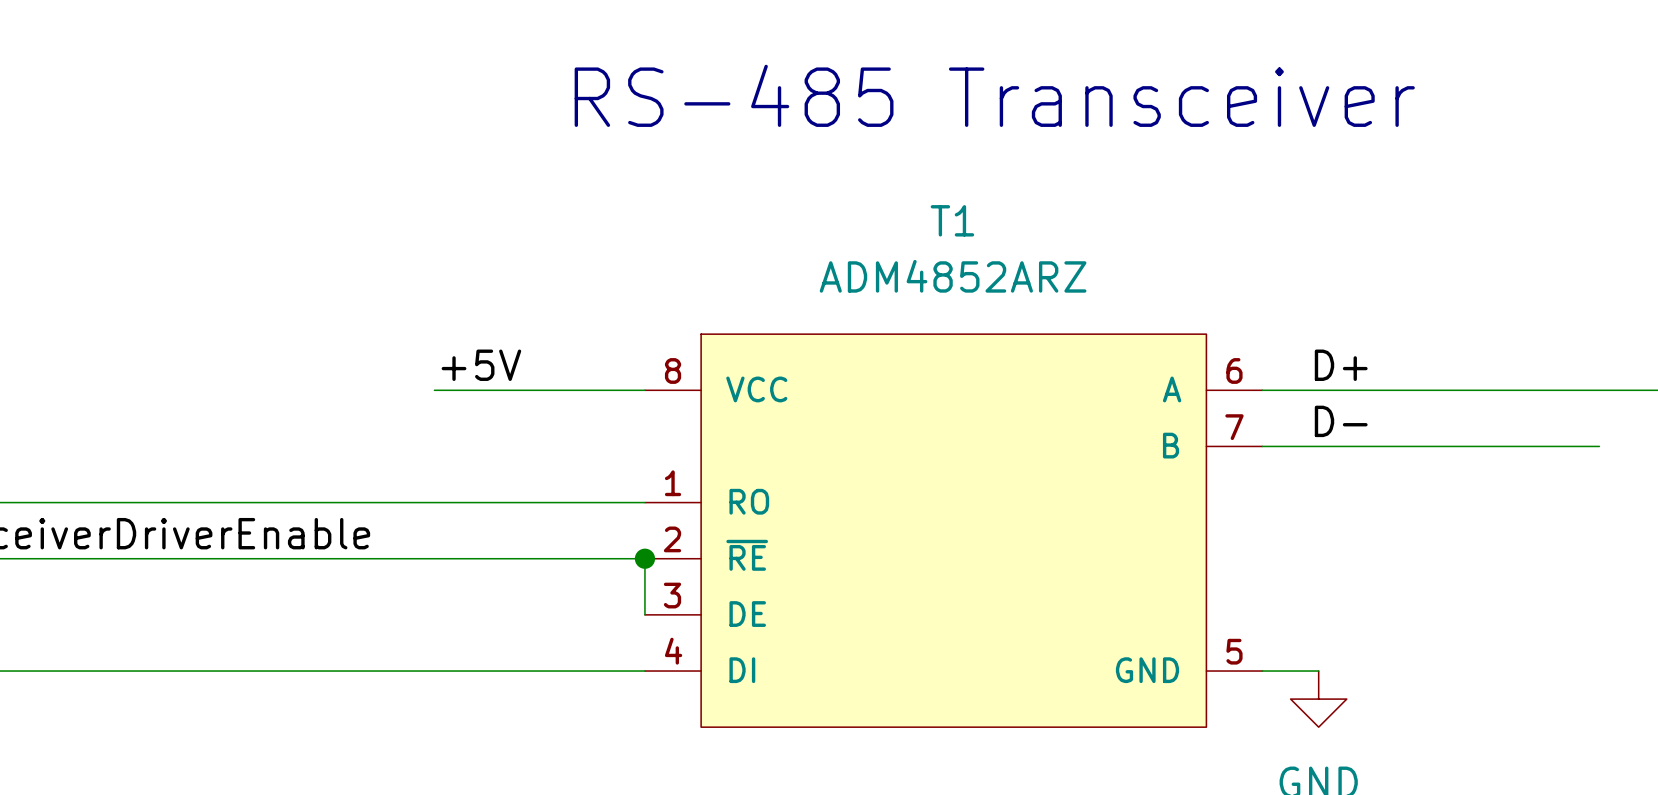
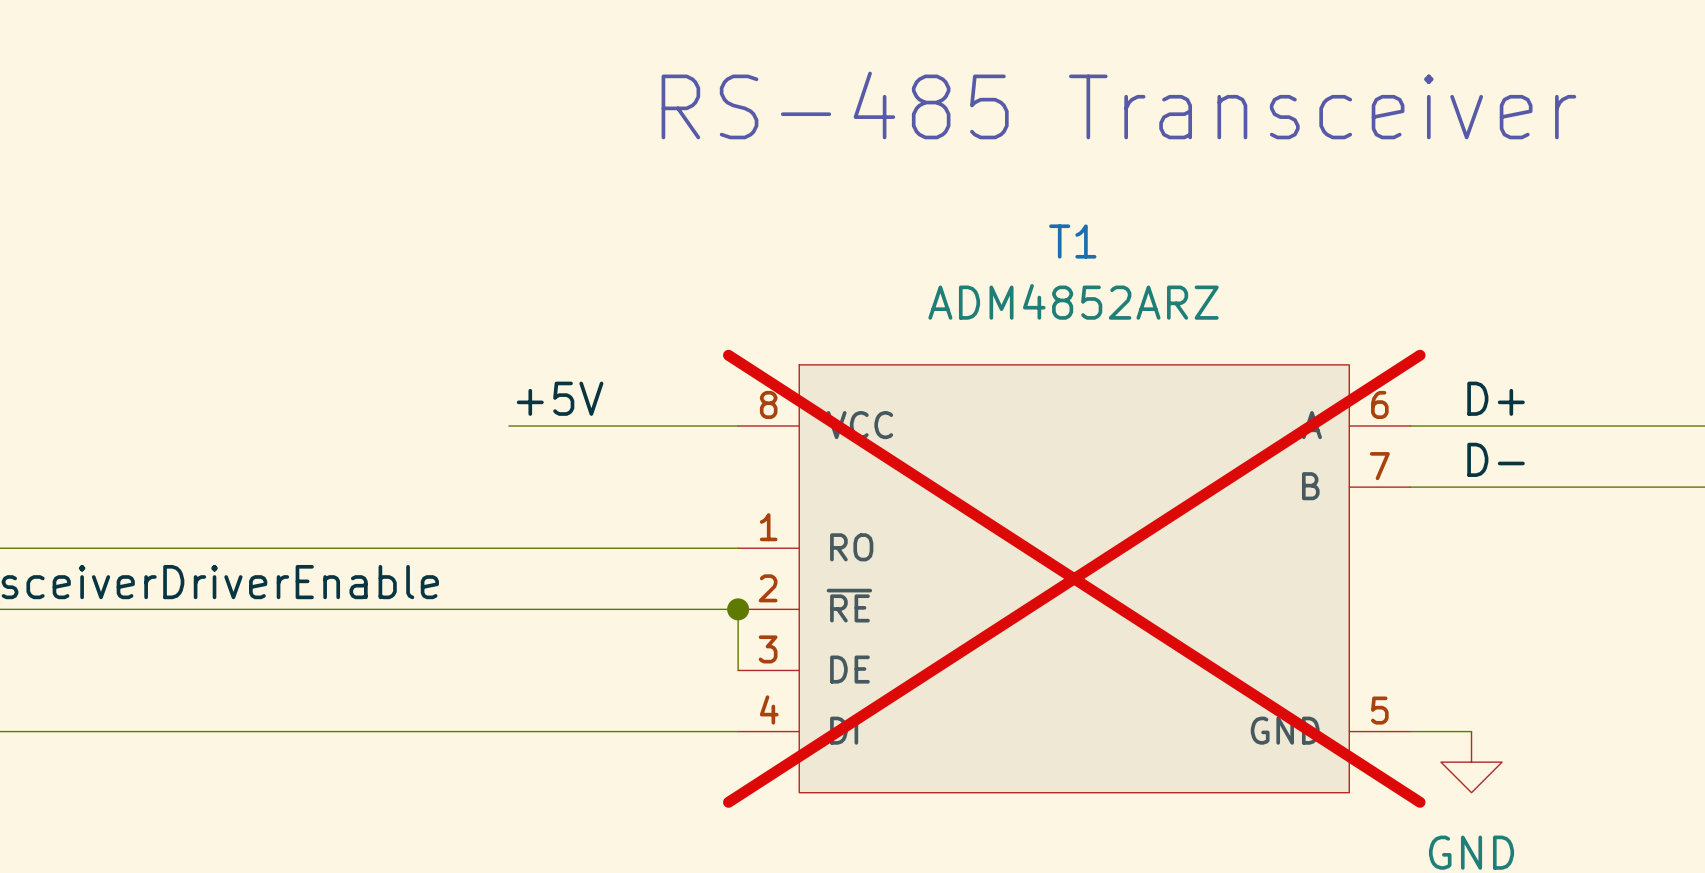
T1 do-not-place cross: none -> (1074, 578)

